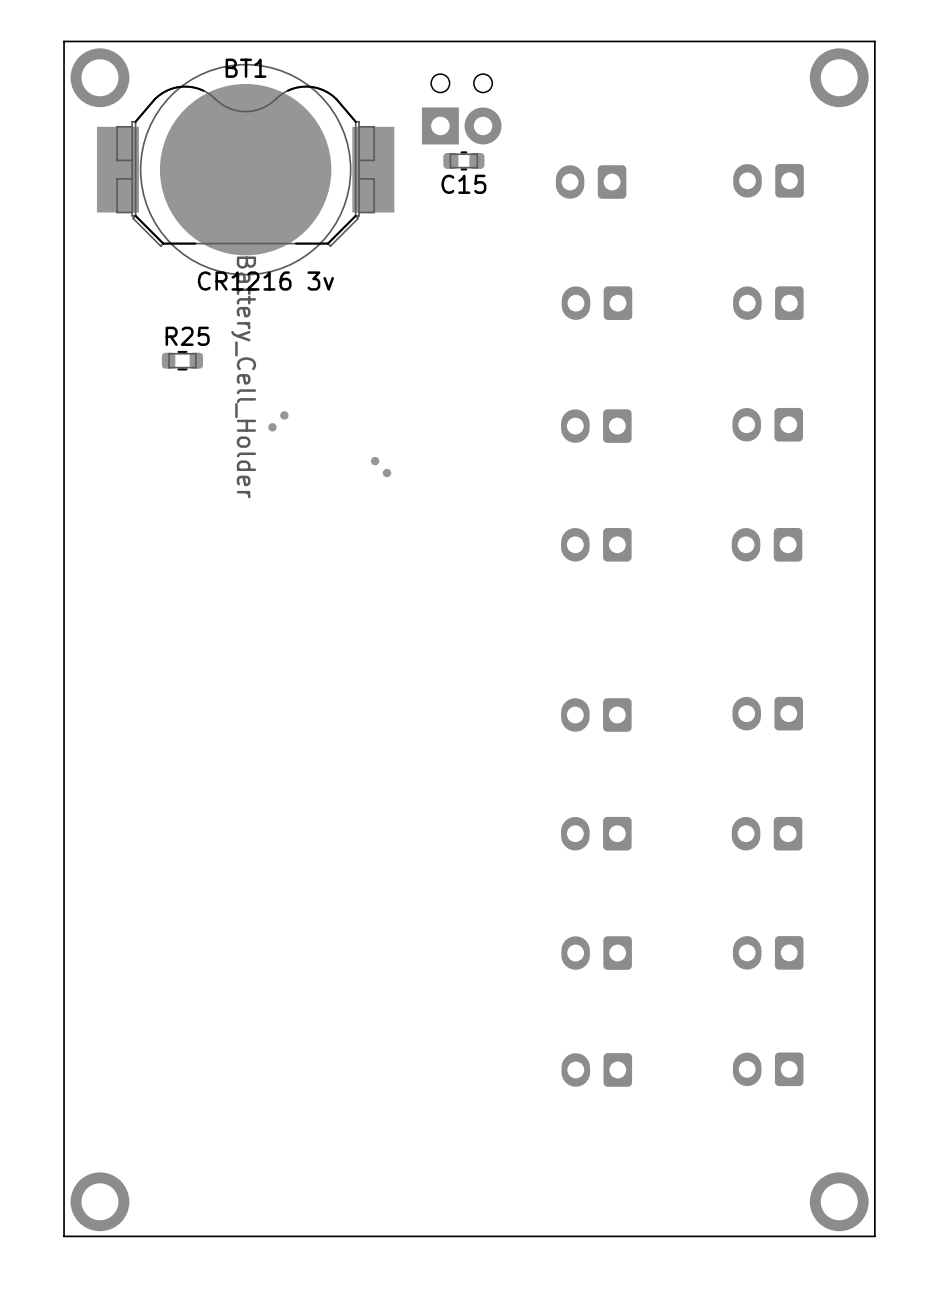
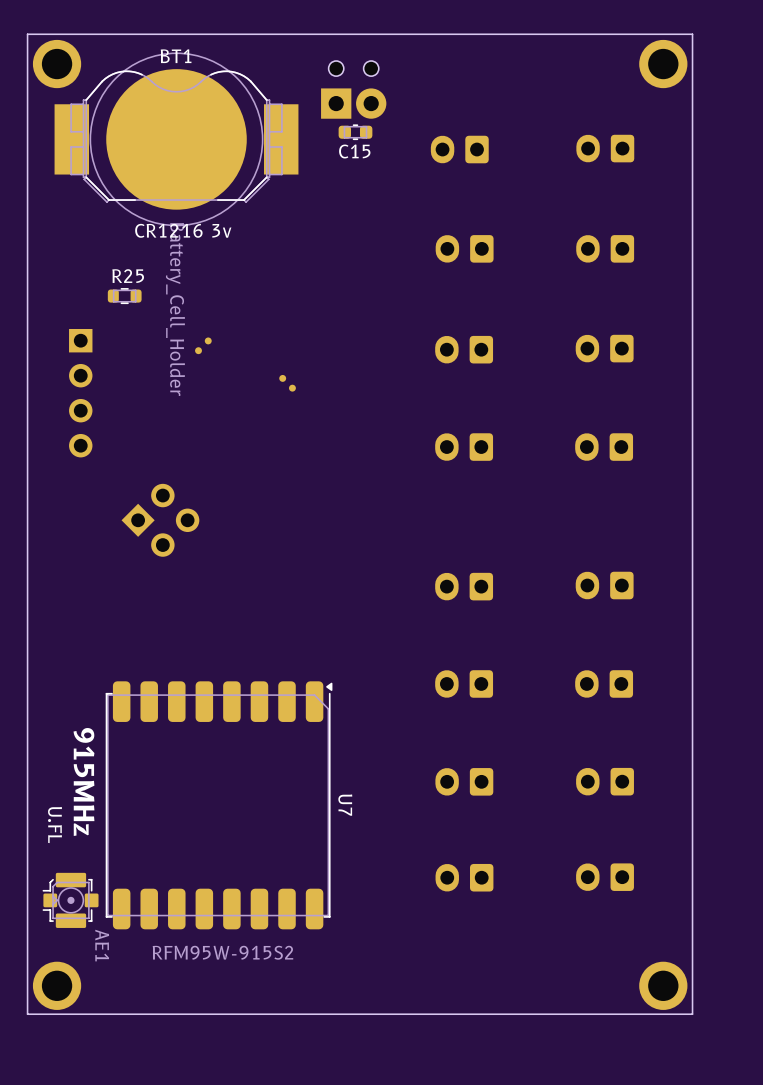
part: none -> (80, 393)
part: none -> (160, 520)
text: none -> 915MHz (83, 781)
U7: none -> RFM95W-915S2 (219, 805)
AE1: none -> U.FL (70, 900)

